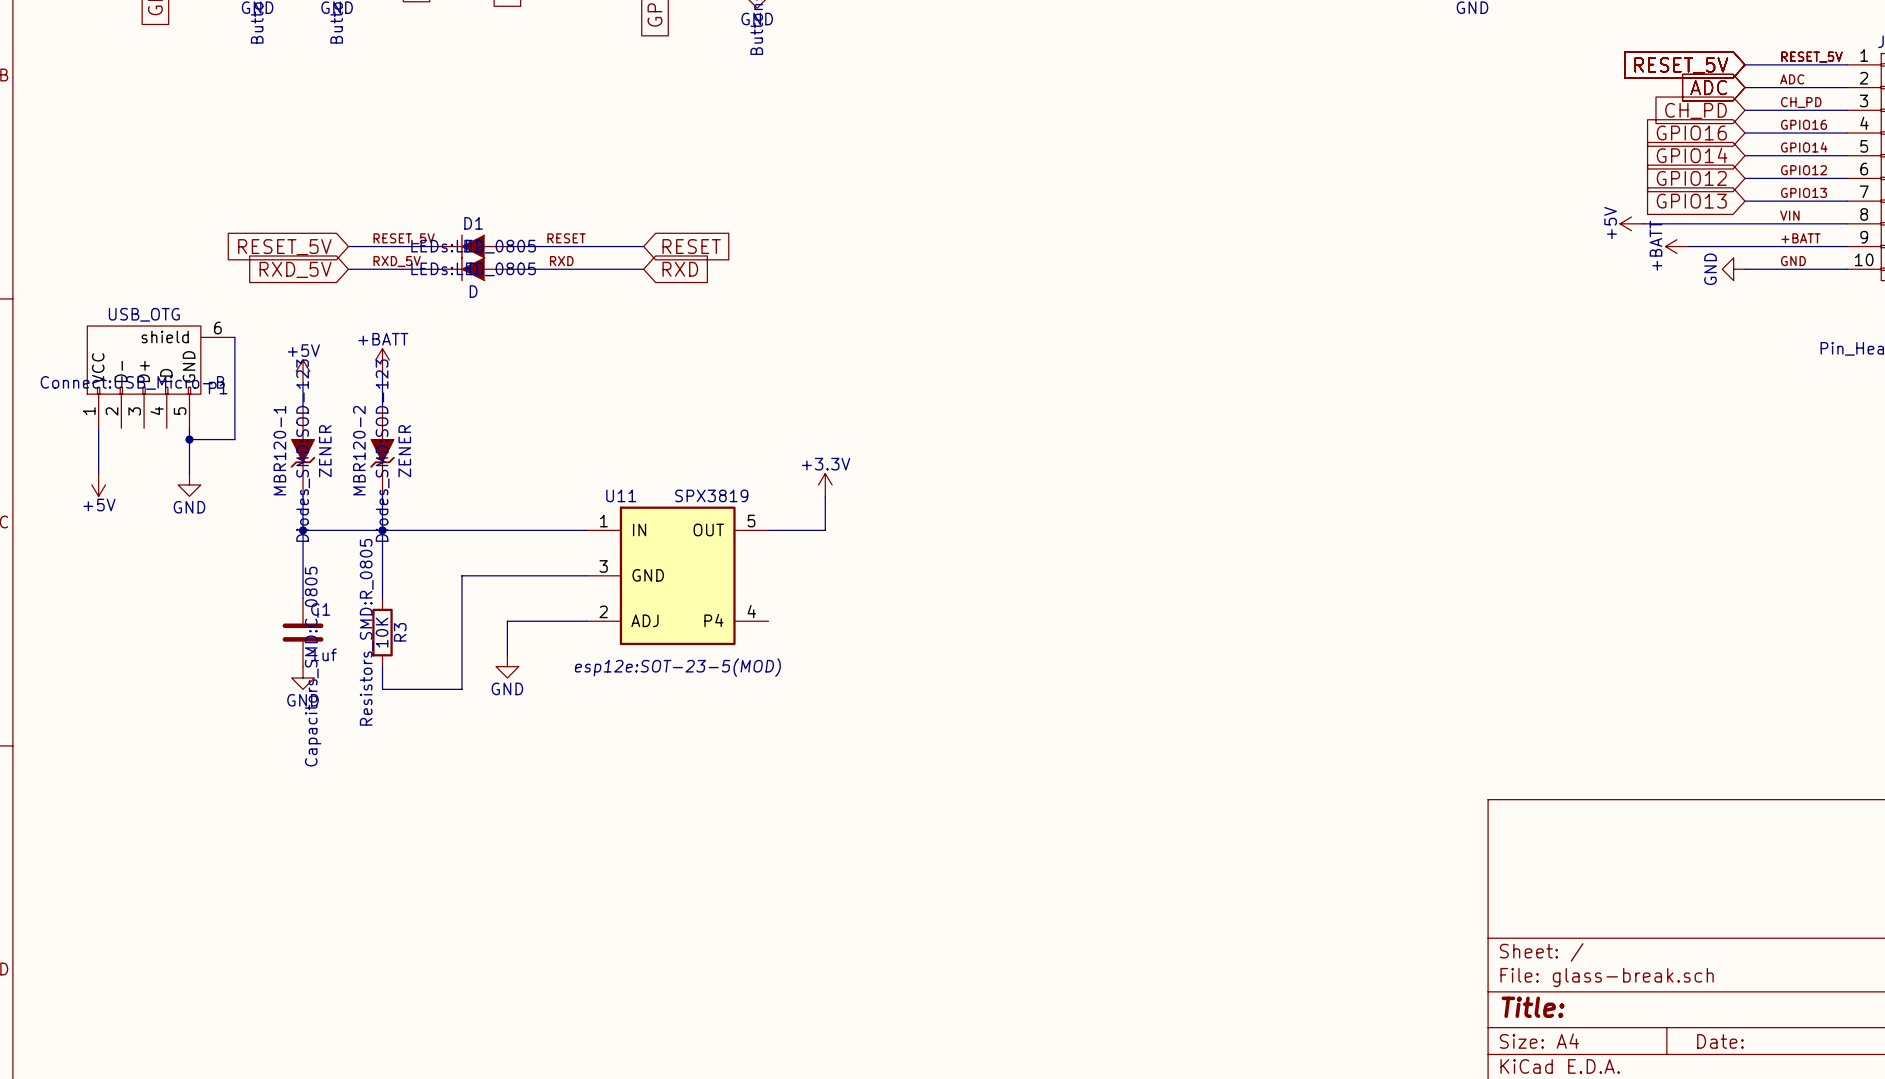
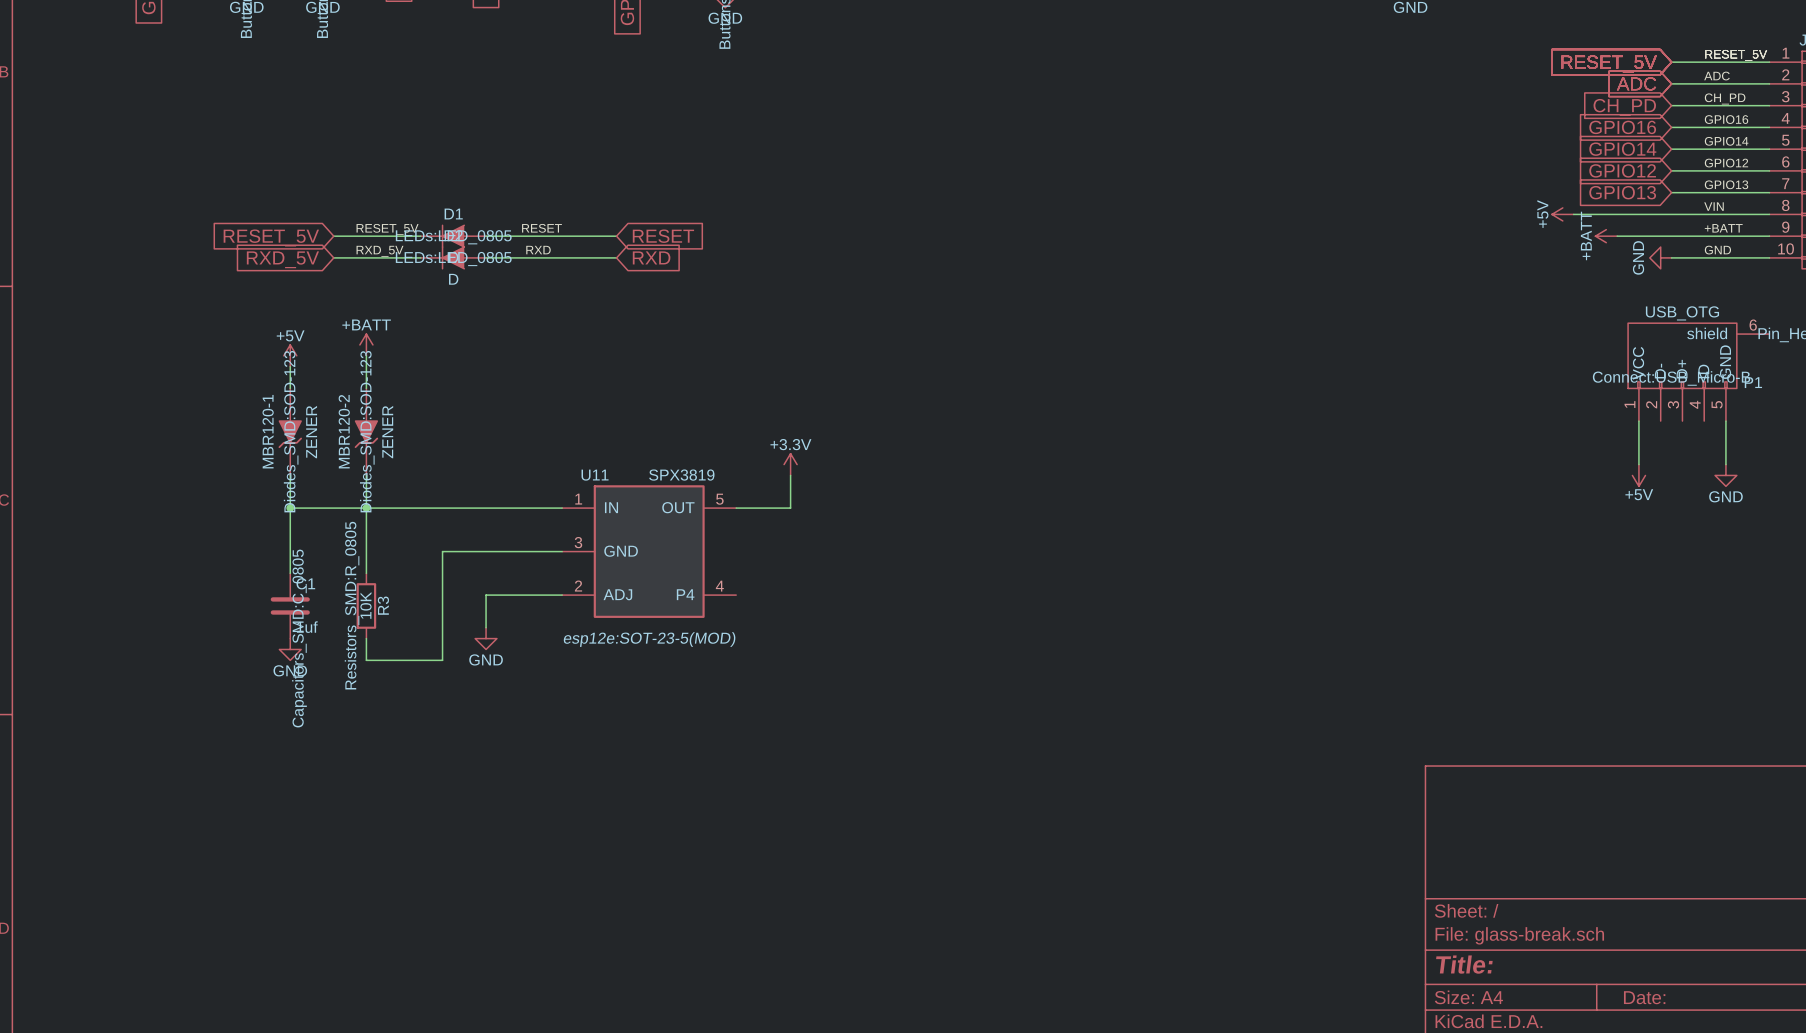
wire: (234, 337) (234, 439) (189, 439) -> none
P1 position: (161, 377) -> (1698, 372)
wire: (98, 428) (98, 473) -> none
wire: (189, 428) (189, 473) -> none
junction: (189, 439) -> none
wire: none -> (1638, 421) (1638, 464)
wire: none -> (1725, 421) (1725, 464)
power symbol: +5V (98, 484) -> none
power symbol: GND (189, 484) -> none
power symbol: none -> +5V (1638, 475)
power symbol: none -> GND (1725, 475)

